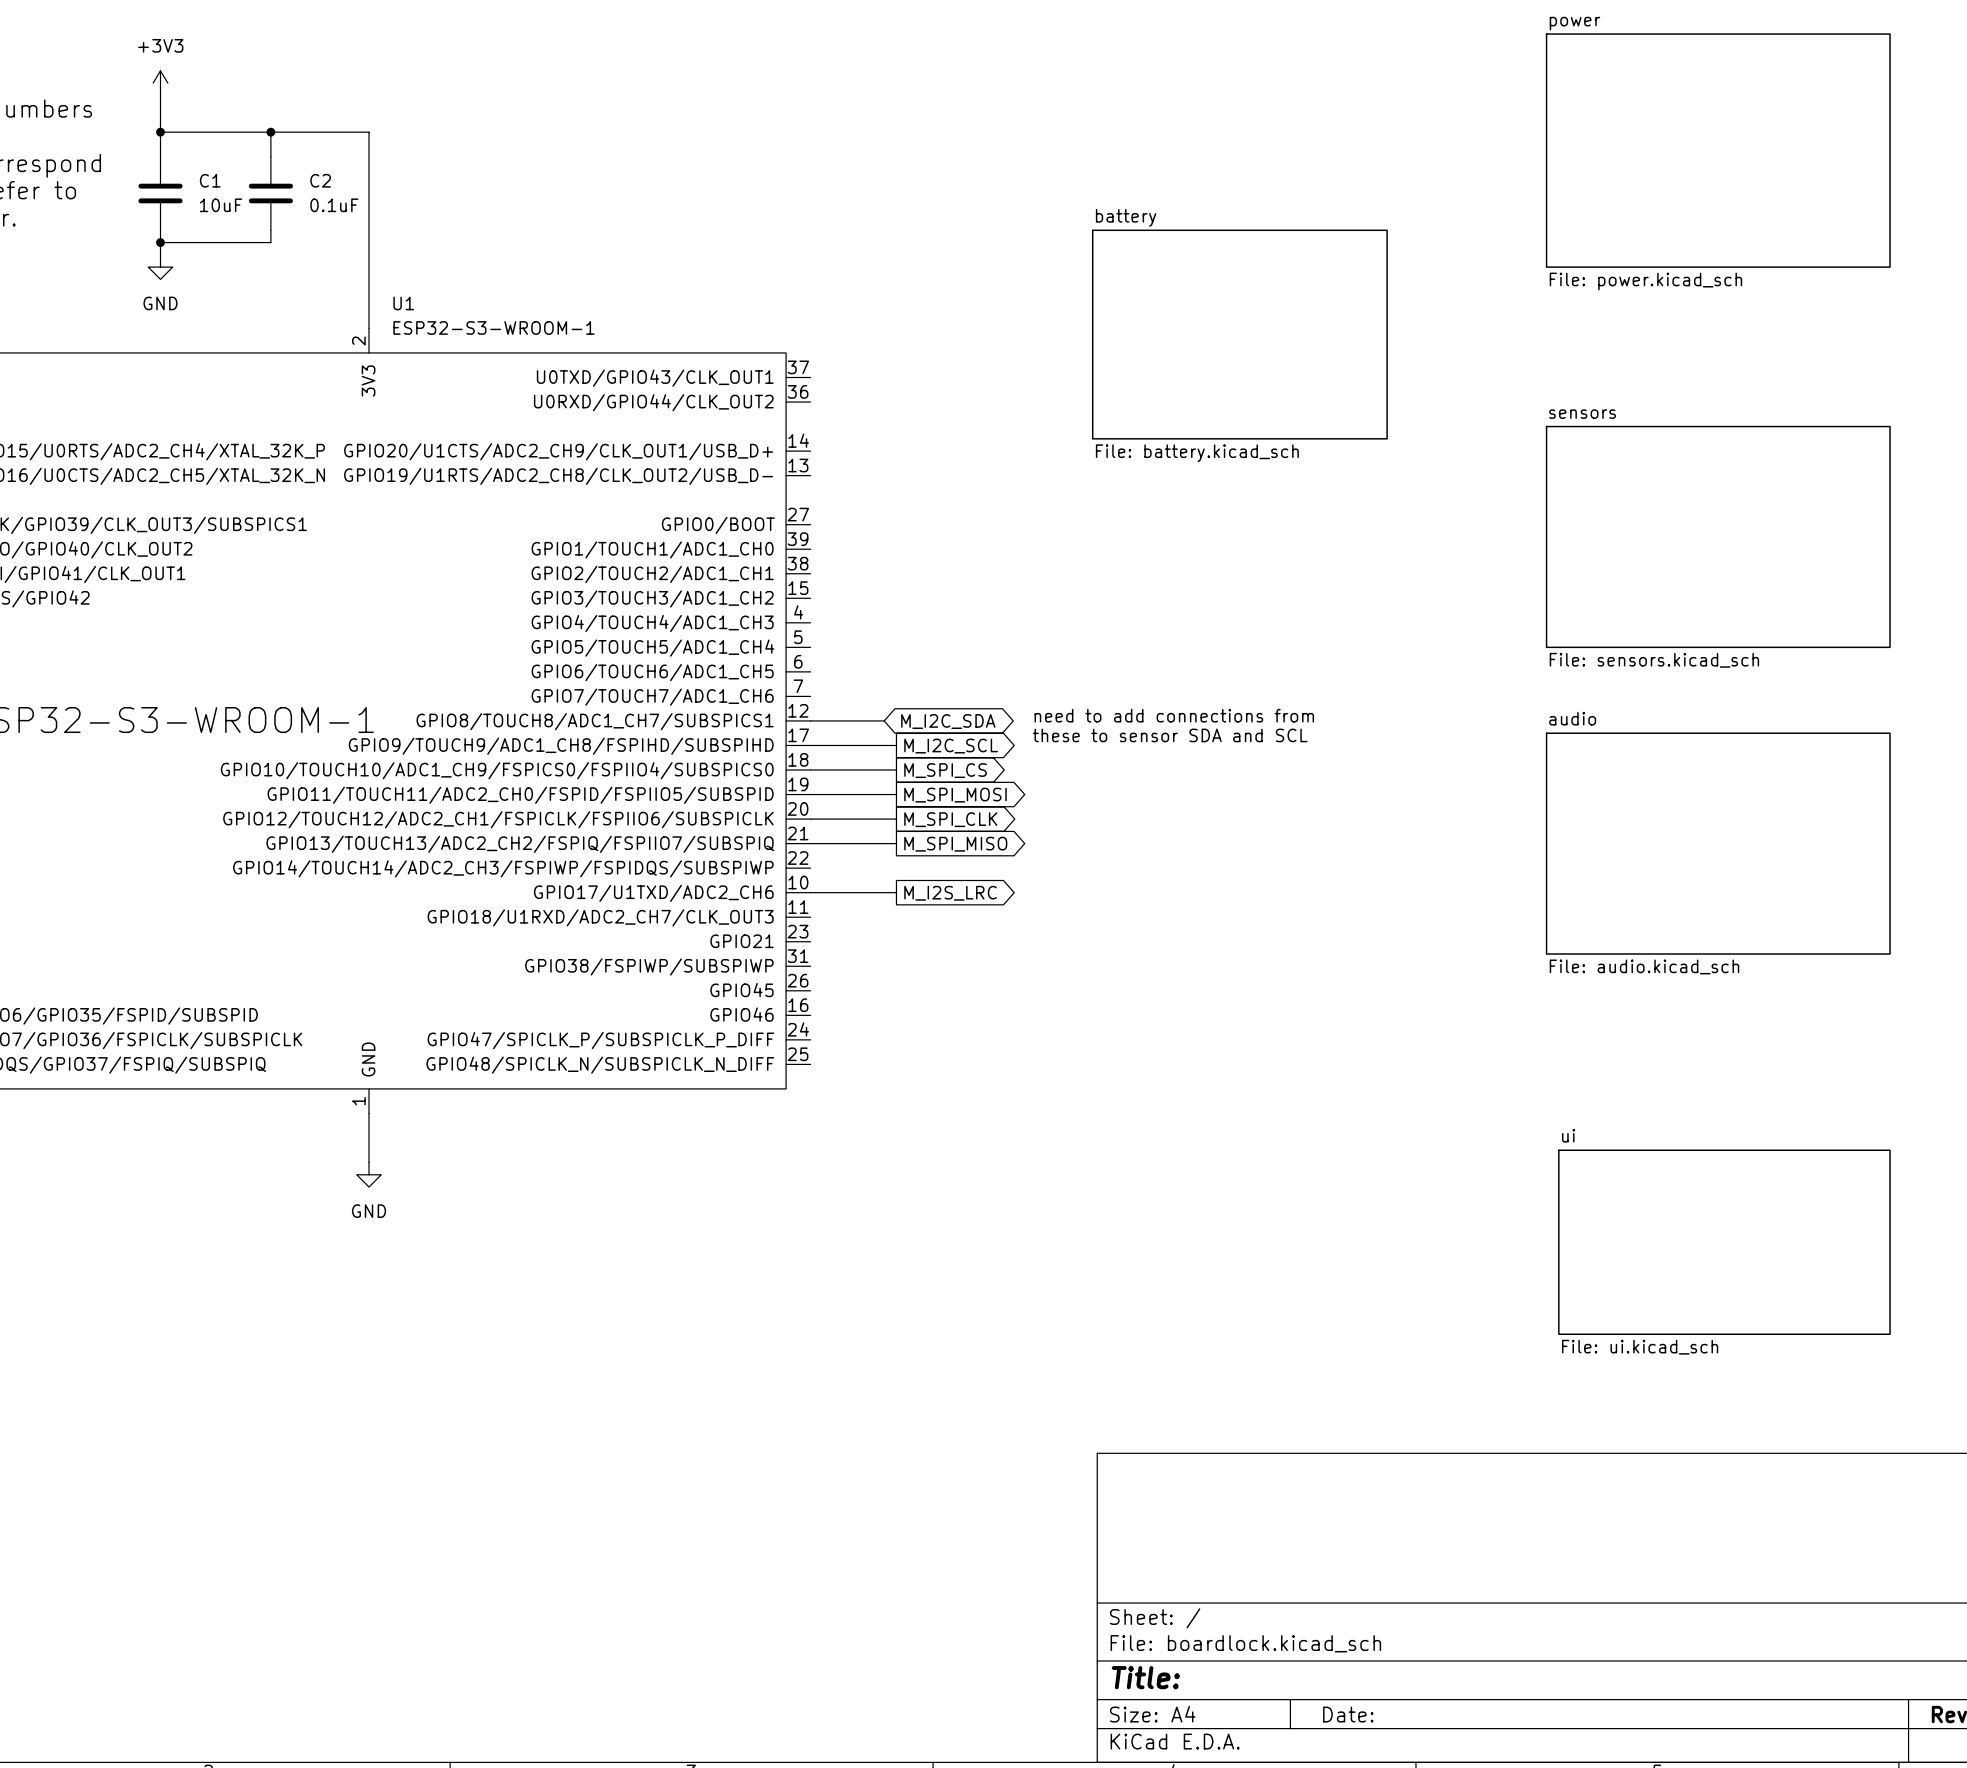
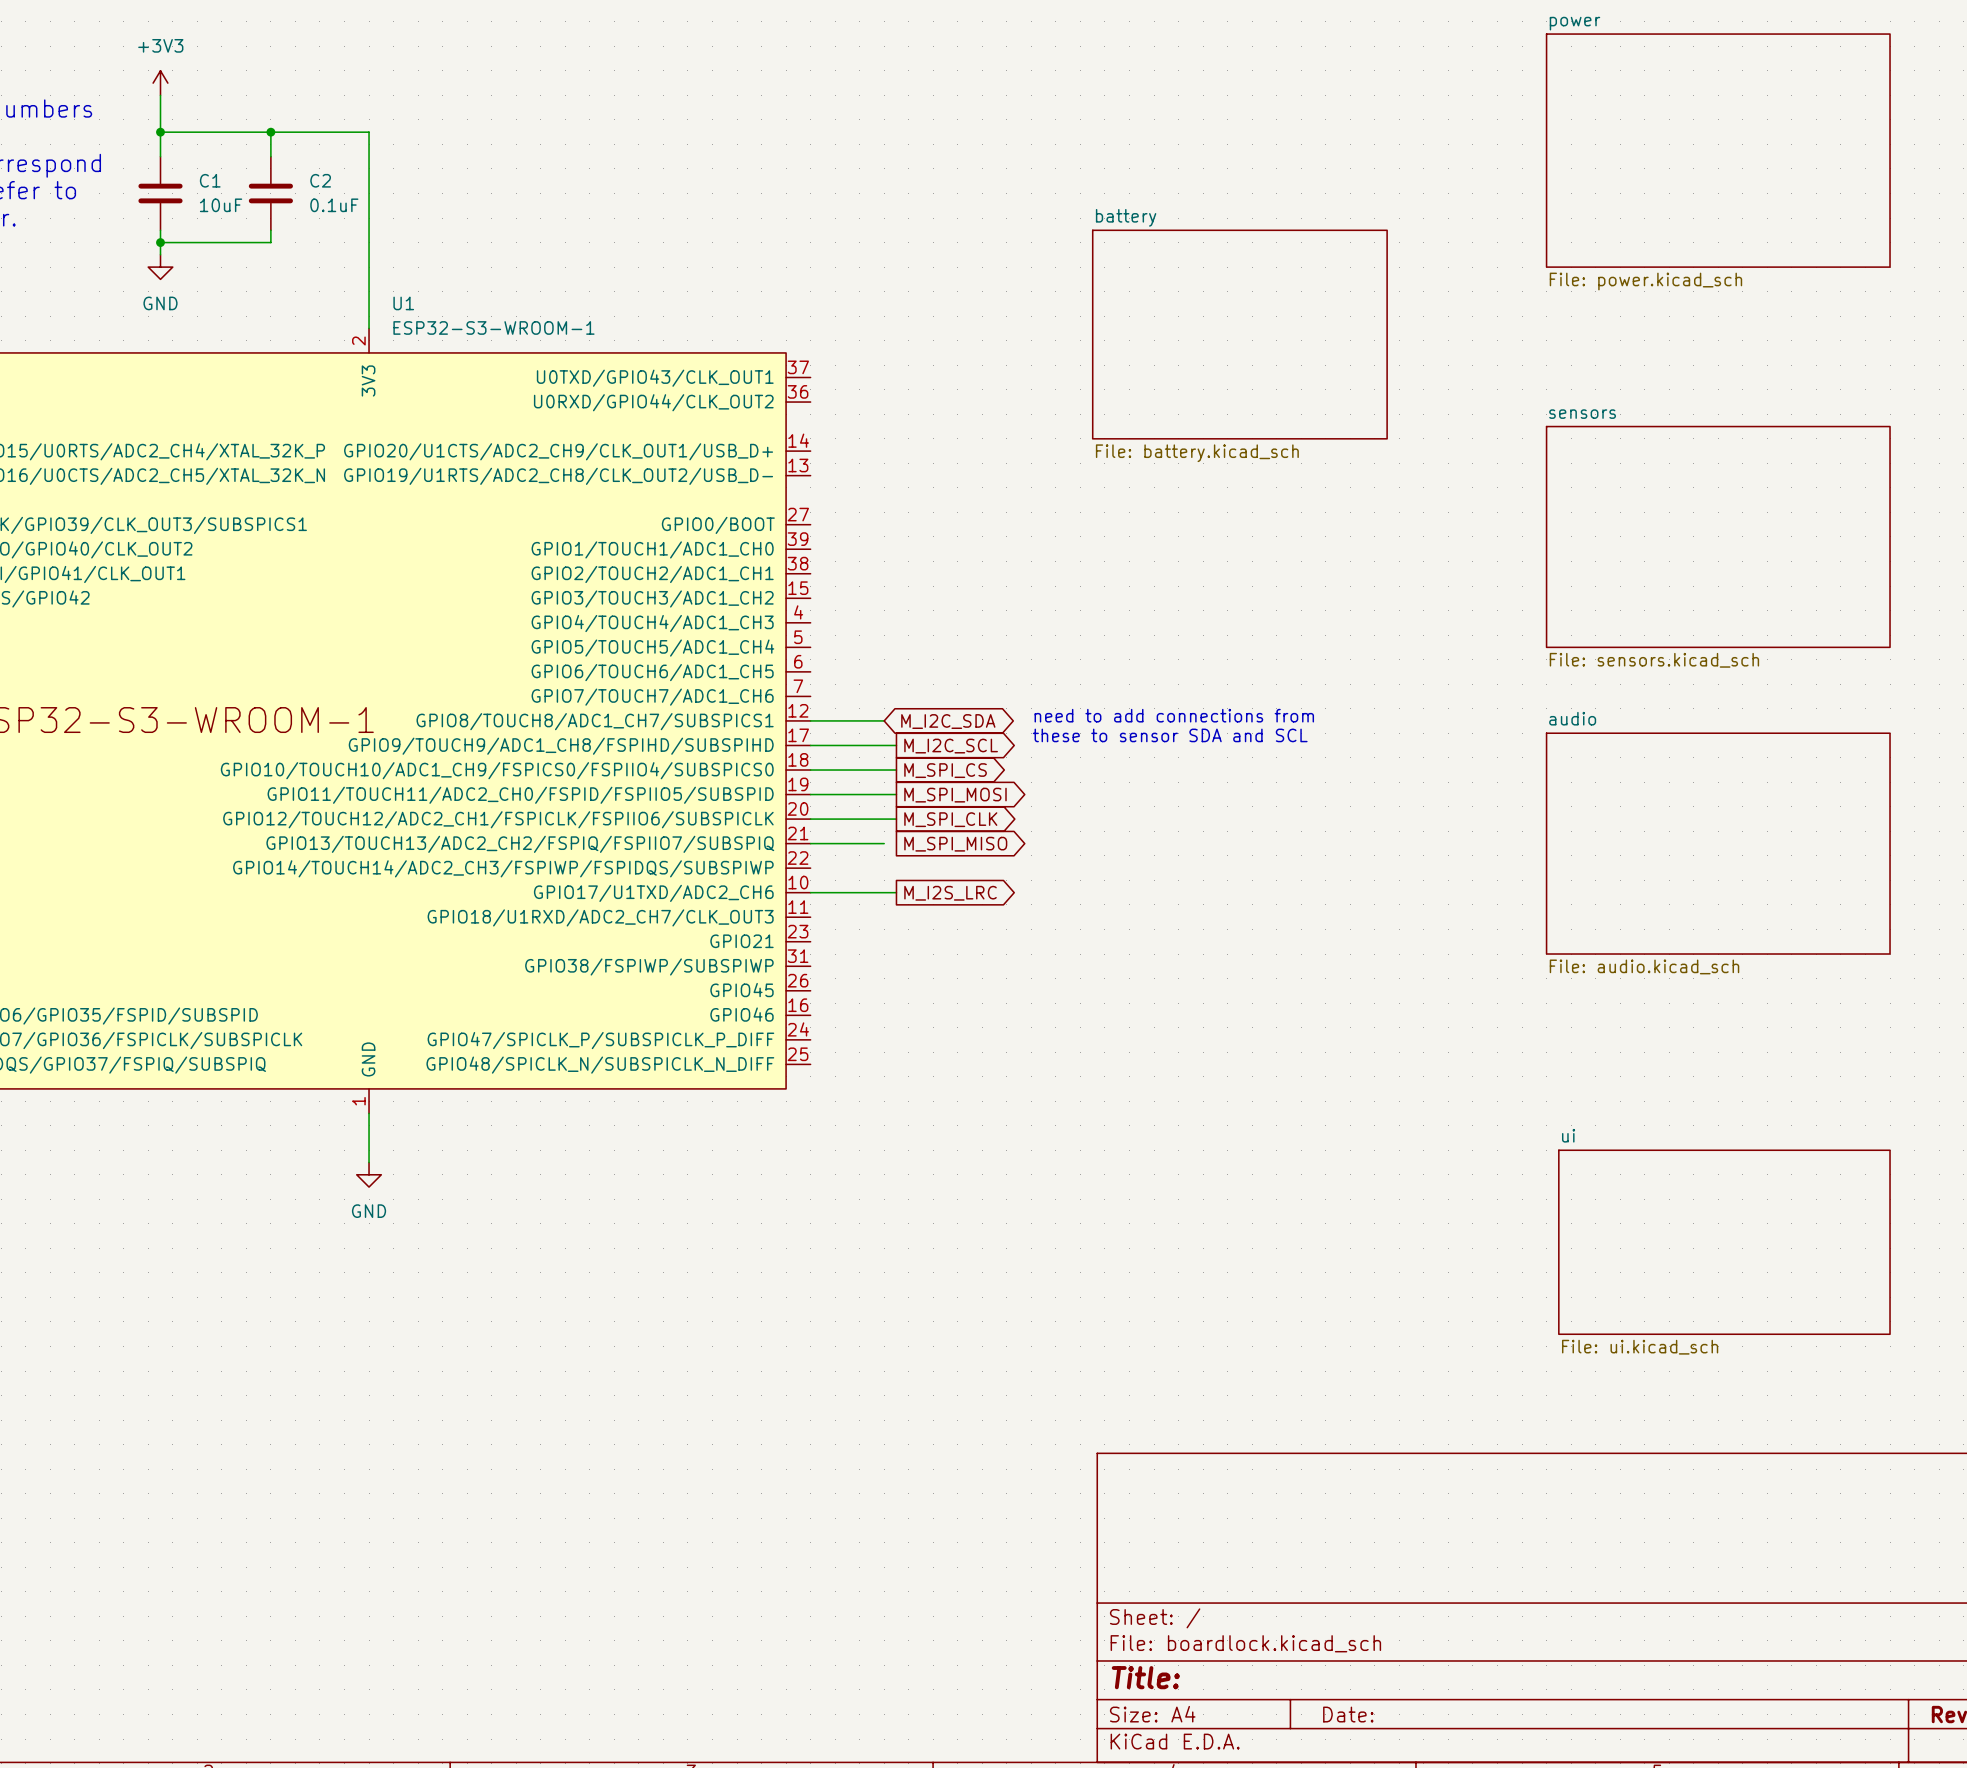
wire: (884, 843) (896, 843) -> none

